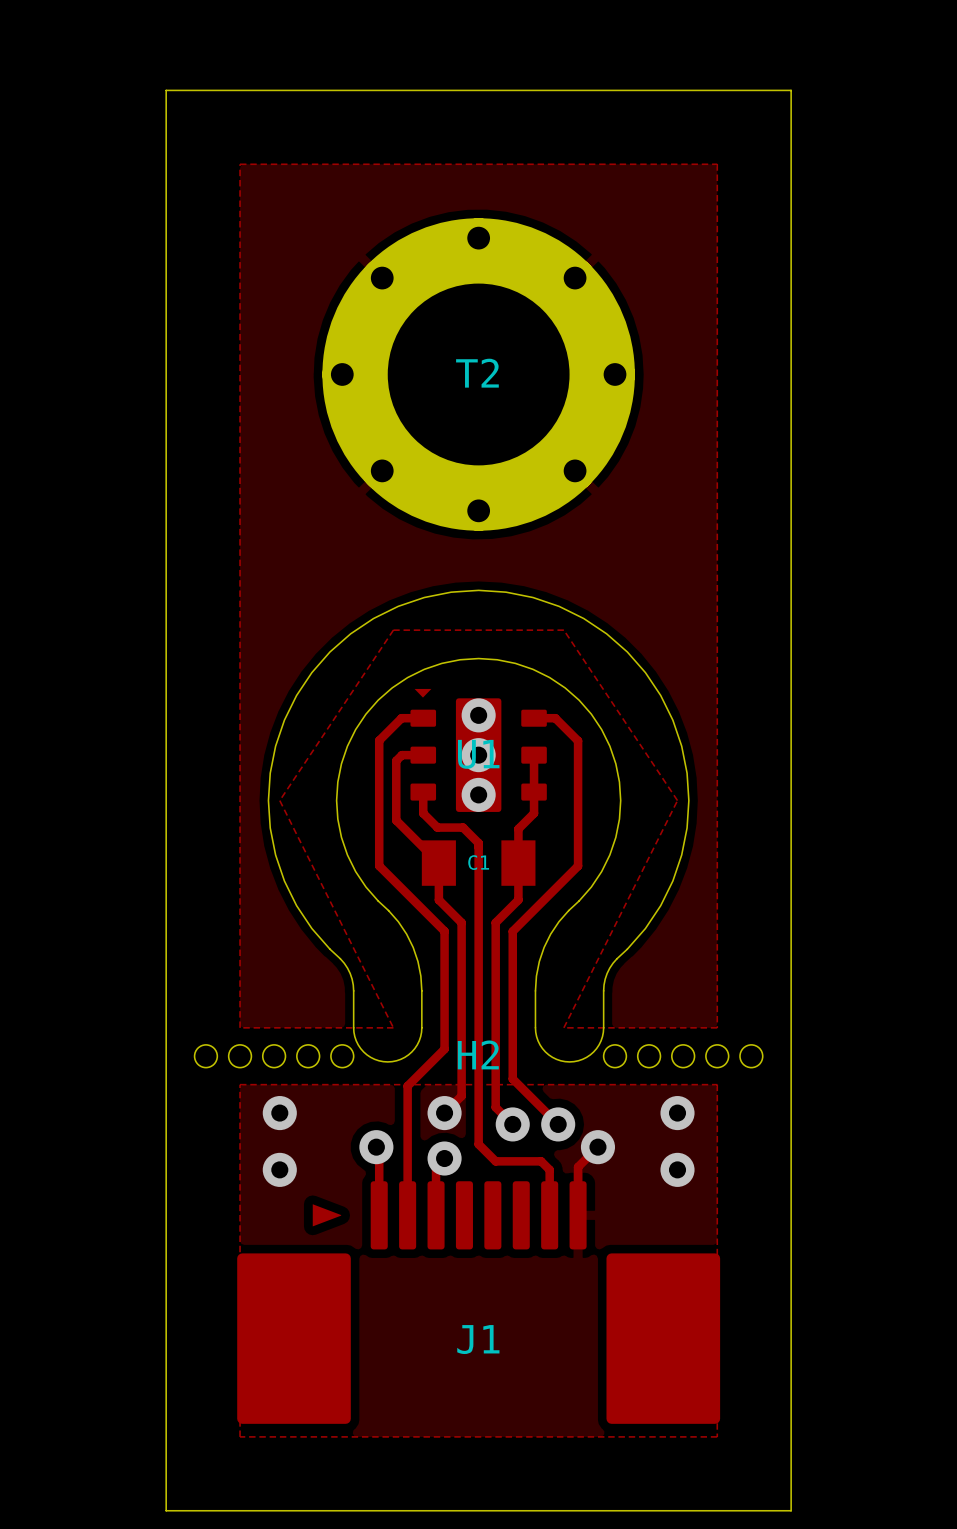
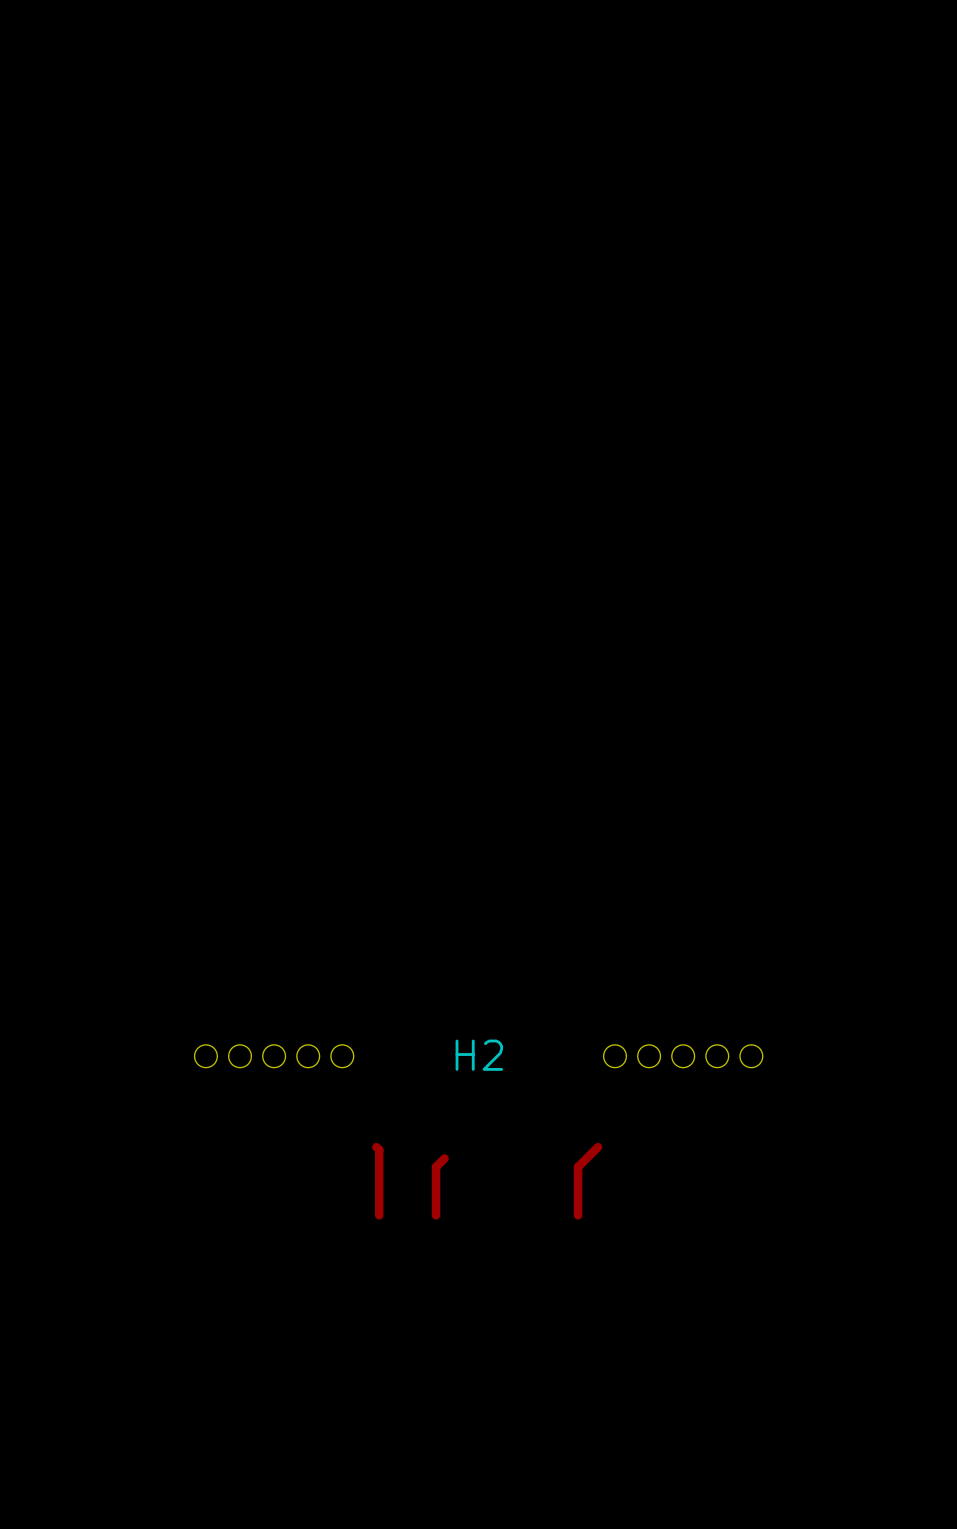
board edge: (166, 90) (166, 1510) (791, 1510) (791, 90) (166, 90) -> none
zone outline: (240, 164) (240, 1027) (393, 1027) (279, 800) (393, 630) (563, 630) (677, 800) (563, 1027) (717, 1027) (717, 164) (240, 164) -> none
T2: (478, 374) -> none
via: (478, 715) -> none
track: (423, 718) (401, 718) (379, 740) (379, 865) (444, 931) (444, 1049) (407, 1086) (407, 1215) -> none
track: (534, 718) (555, 718) (578, 740) (578, 866) (512, 931) (512, 1078) (558, 1124) -> none
U1: (478, 750) -> none
track: (423, 755) (401, 755) (396, 760) (396, 820) (438, 863) (438, 900) (461, 922) (461, 1096) (444, 1113) -> none
via: (478, 755) -> none
track: (534, 755) (534, 813) (518, 828) (518, 863) -> none
track: (423, 792) (423, 813) (437, 827) (463, 827) (478, 843) (478, 1144) (495, 1161) (541, 1161) (549, 1169) (549, 1215) -> none
via: (478, 794) -> none
C1: (478, 863) -> none
track: (518, 868) (518, 900) (495, 922) (495, 1107) (512, 1124) -> none
board edge: (378, 901) (398, 921) (406, 934) (417, 961) (420, 976) (420, 1036) (414, 1048) (408, 1054) (392, 1061) (383, 1061) (370, 1057) (358, 1044) (353, 1032) (353, 990) (350, 973) (344, 963) (311, 928) (296, 905) (284, 881) (275, 854) (270, 828) (268, 800) (270, 773) (275, 746) (284, 720) (296, 695) (311, 672) (330, 651) (350, 633) (373, 618) (398, 606) (424, 597) (451, 592) (478, 590) (506, 592) (533, 597) (559, 606) (583, 618) (606, 633) (627, 651) (645, 672) (660, 695) (672, 720) (681, 746) (687, 773) (688, 800) (687, 828) (681, 854) (672, 881) (660, 905) (645, 928) (613, 963) (607, 973) (603, 990) (603, 1032) (601, 1040) (593, 1051) (582, 1059) (574, 1061) (556, 1059) (542, 1048) (535, 1032) (536, 976) (544, 947) (558, 921) (591, 887) (601, 871) (615, 837) (619, 819) (619, 782) (609, 746) (591, 714) (565, 687) (533, 669) (515, 663) (497, 659) (460, 659) (424, 669) (407, 677) (392, 687) (365, 714) (355, 729) (341, 763) (336, 800) (341, 837) (347, 854) (365, 887) (378, 901) -> none
zone outline: (240, 1084) (240, 1436) (717, 1436) (717, 1084) (240, 1084) -> none
via: (279, 1113) -> none
via: (444, 1113) -> none
via: (677, 1113) -> none
via: (512, 1124) -> none
via: (558, 1124) -> none
via: (376, 1147) -> none
via: (597, 1147) -> none
via: (444, 1158) -> none
via: (279, 1169) -> none
via: (677, 1169) -> none
J1: (478, 1302) -> none

